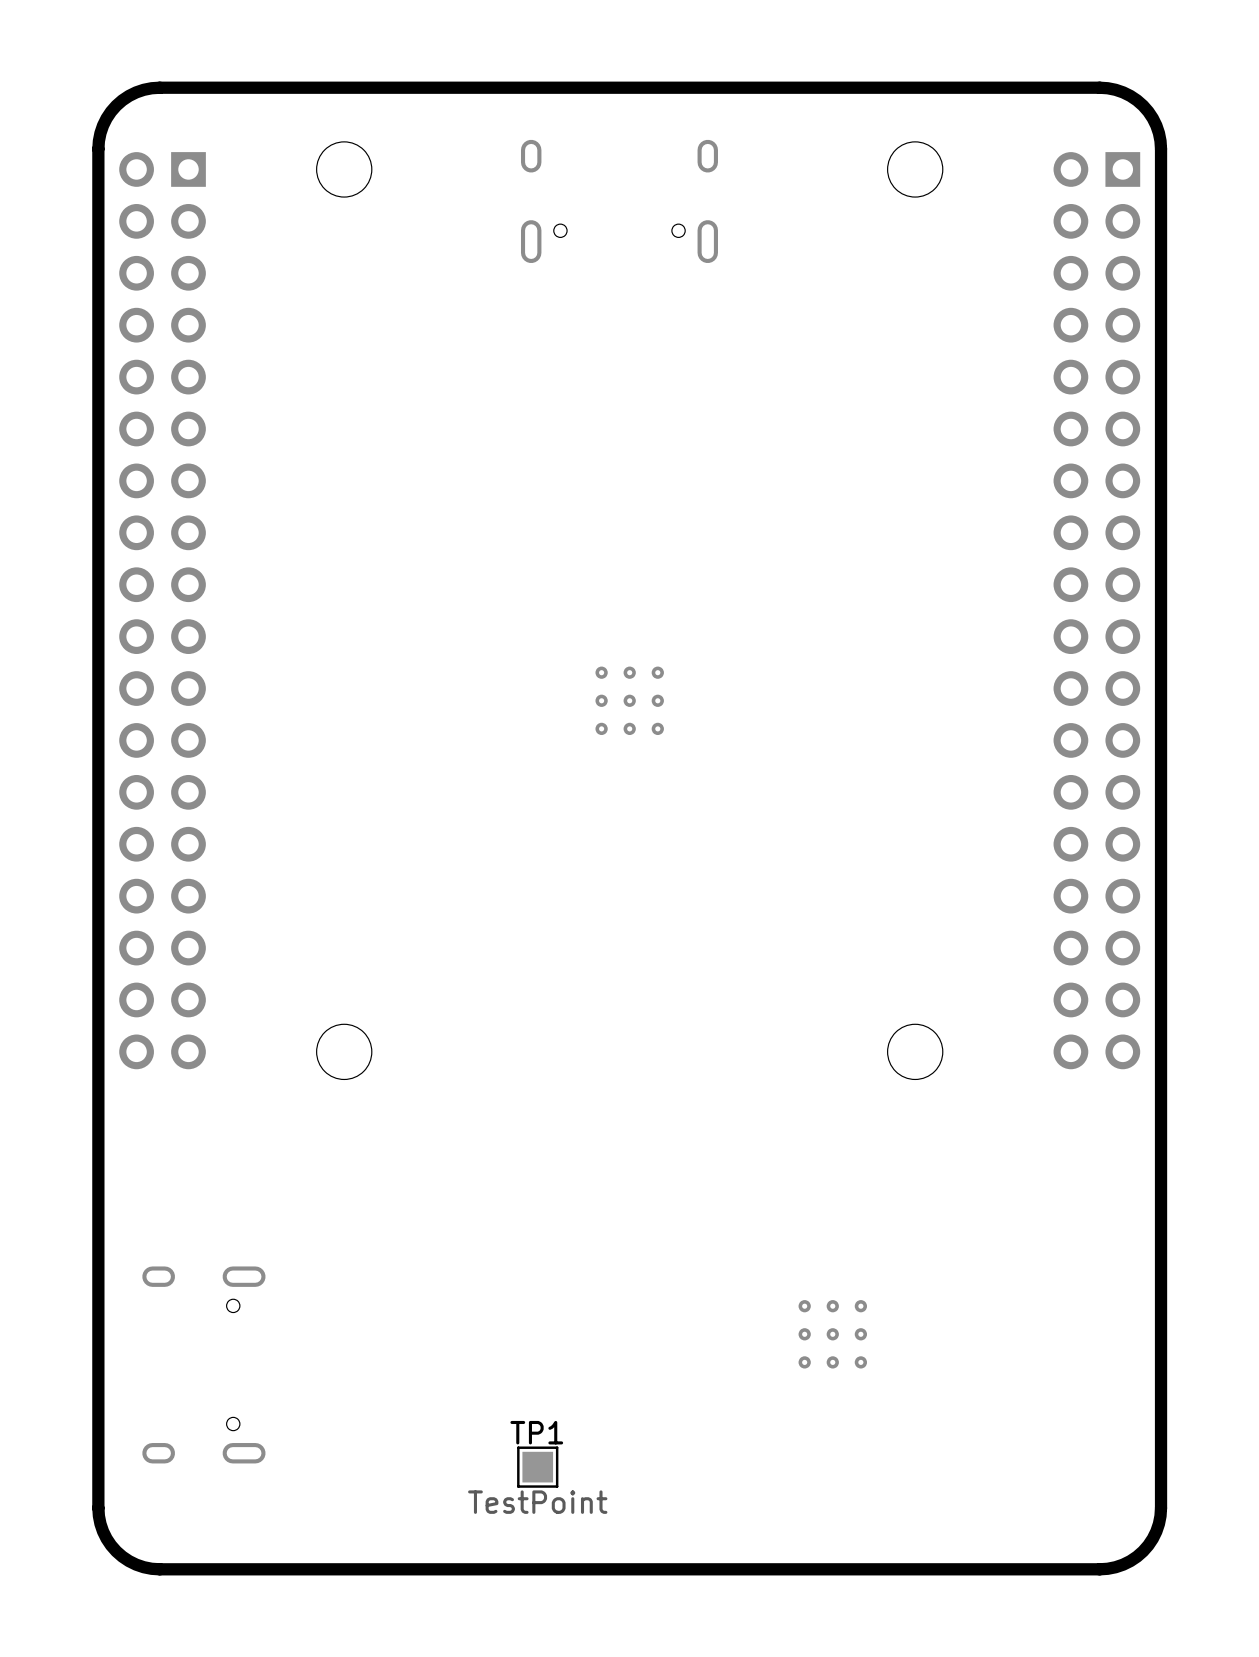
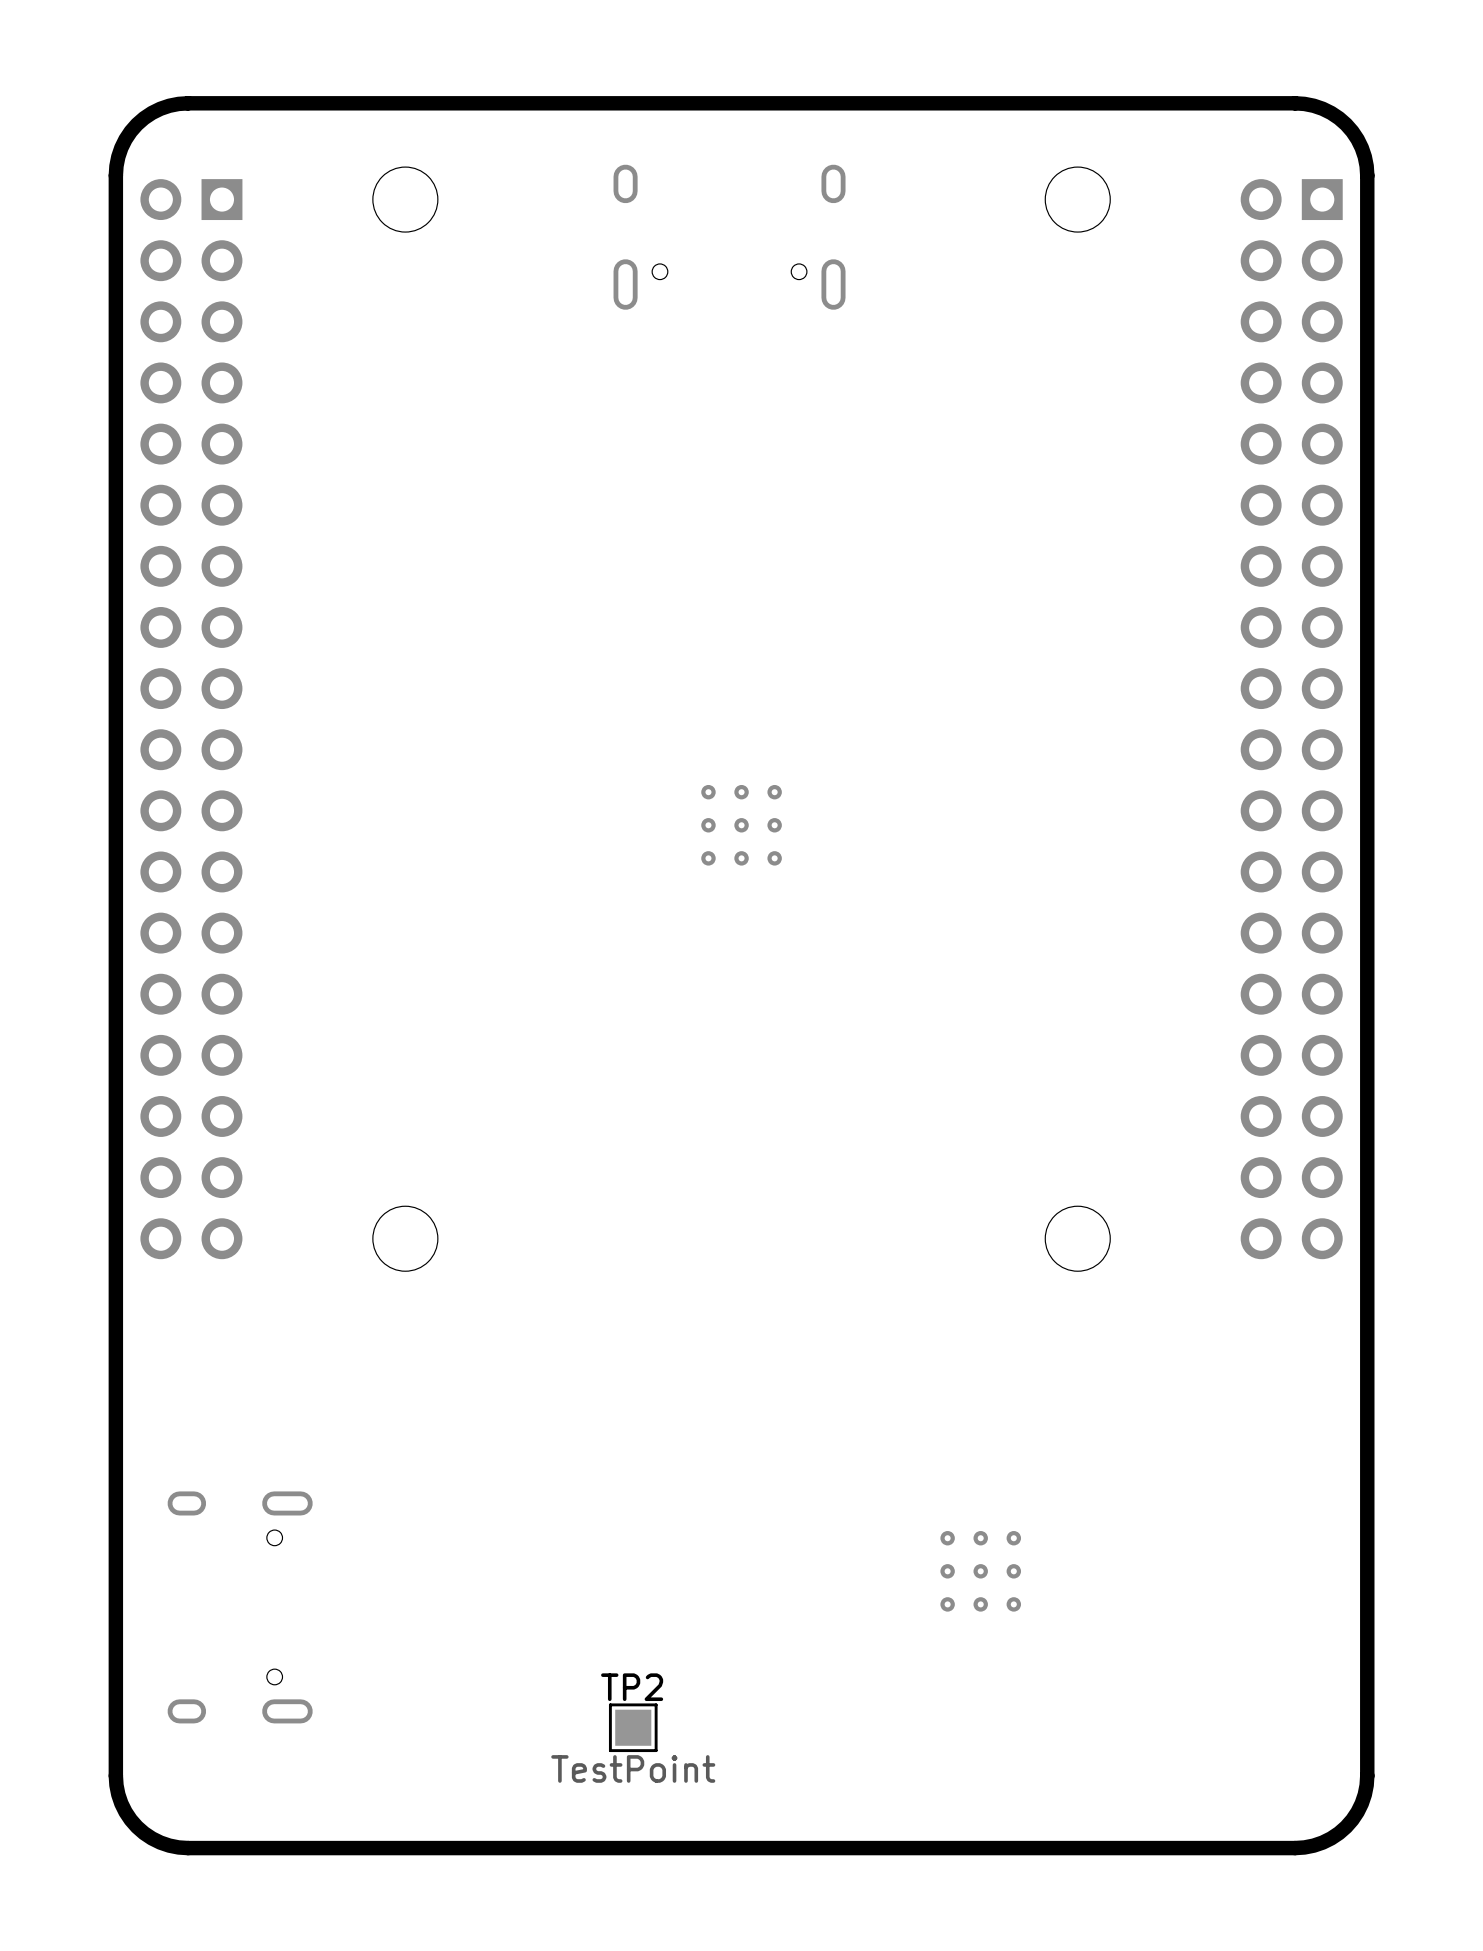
TP1 name: TP1 (536, 1432) -> TP2 (632, 1687)

